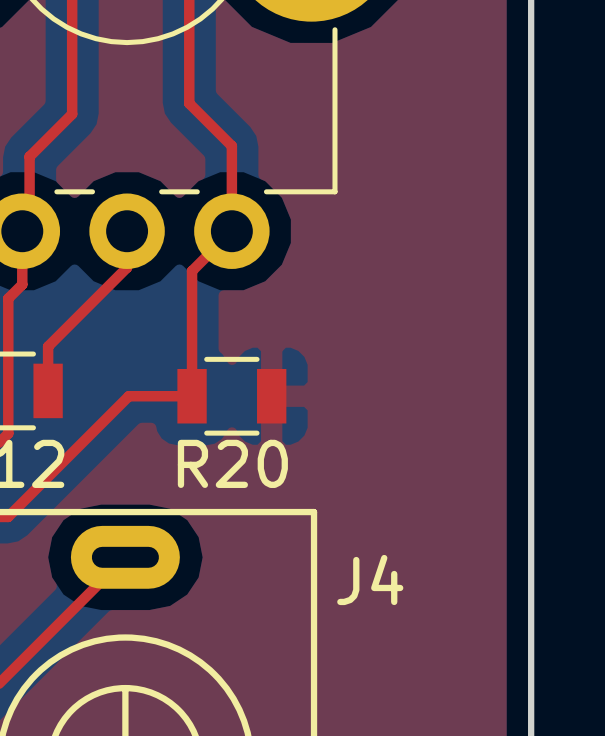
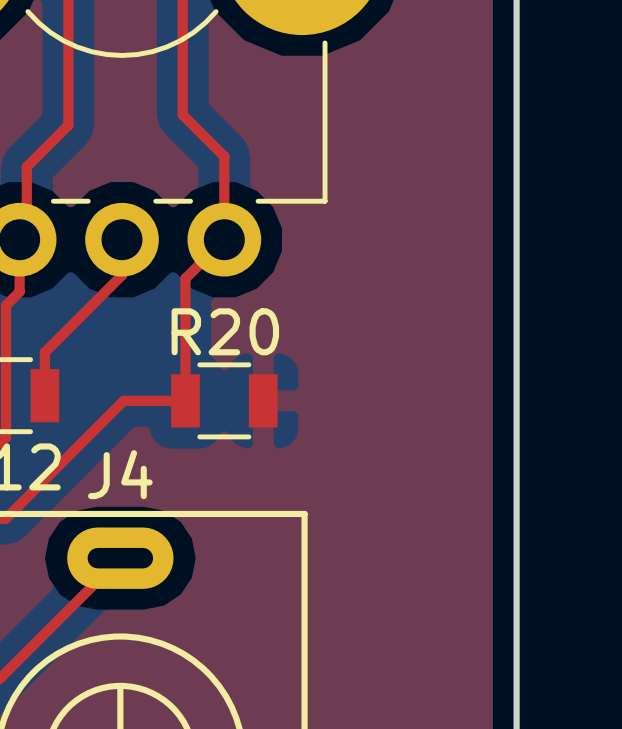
R20 name position: R20 (232, 463) -> R20 (225, 331)
J4 name position: J4 (370, 579) -> J4 (120, 474)

